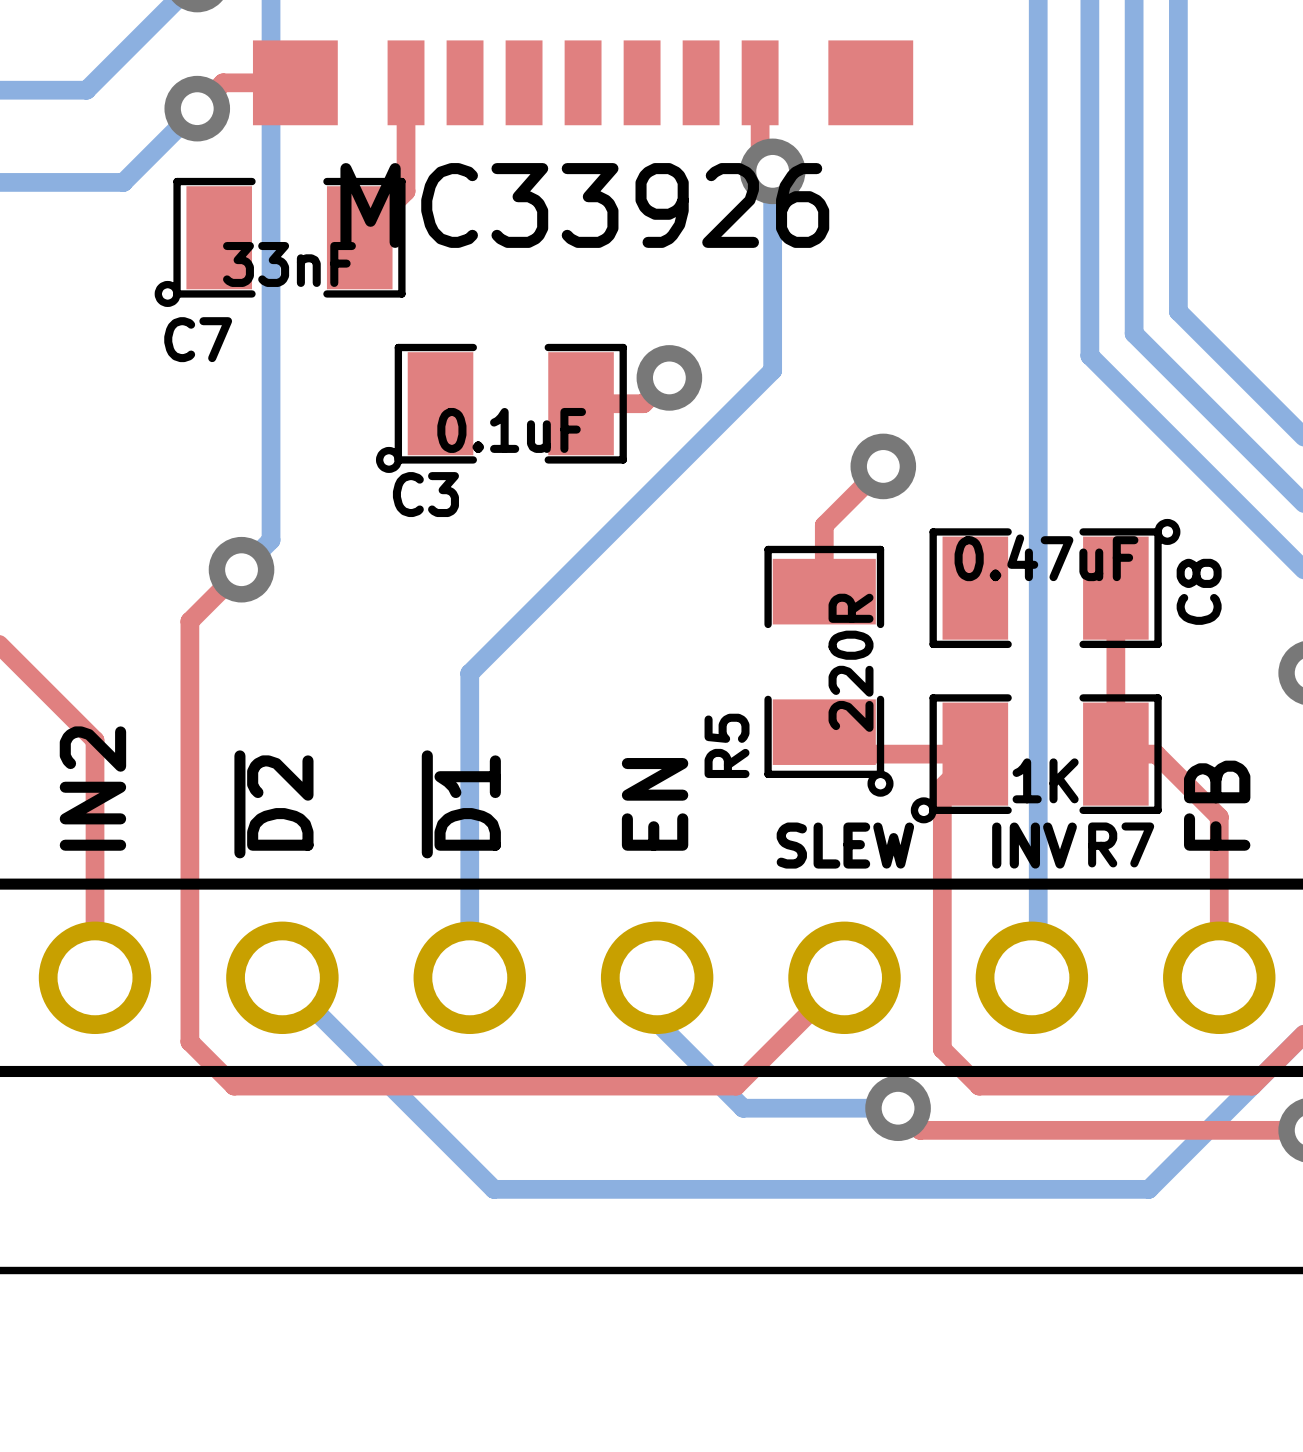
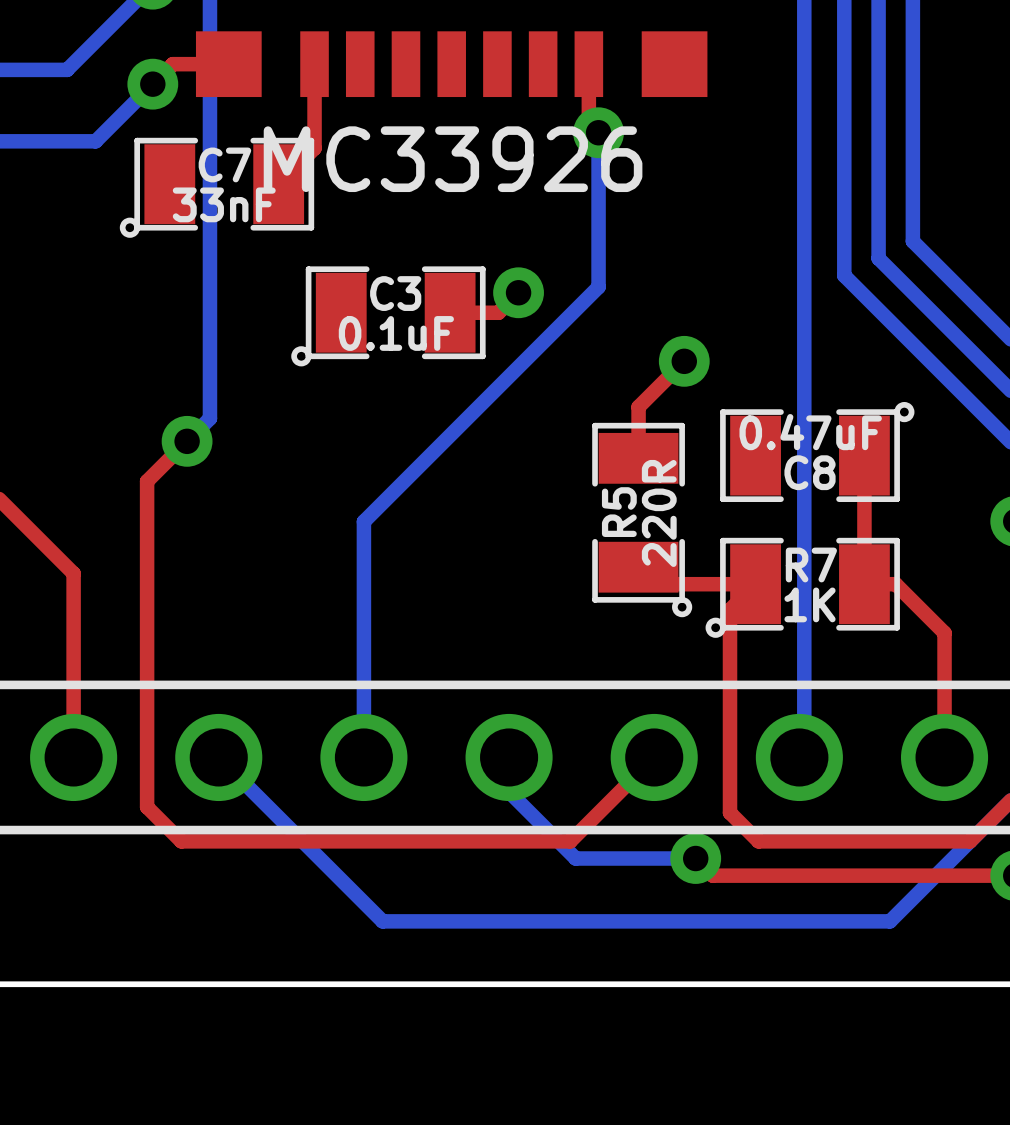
C7 name position: C7 (198, 339) -> C7 (224, 164)
C3 name position: C3 (425, 494) -> C3 (395, 293)
C8 name rotation: 0° (1199, 591) -> 90° clockwise (810, 472)
C8 name position: C8 (1199, 591) -> C8 (810, 472)
R5 name position: R5 (727, 745) -> R5 (619, 512)
text: IN2 (92, 788) -> none
text: ~{D2} (273, 804) -> none
text: ~{D1} (461, 804) -> none
text: EN (655, 804) -> none
text: FB (1217, 805) -> none
R7 name position: R7 (1121, 844) -> R7 (811, 564)
text: SLEW (845, 845) -> none
text: INV (1034, 845) -> none

